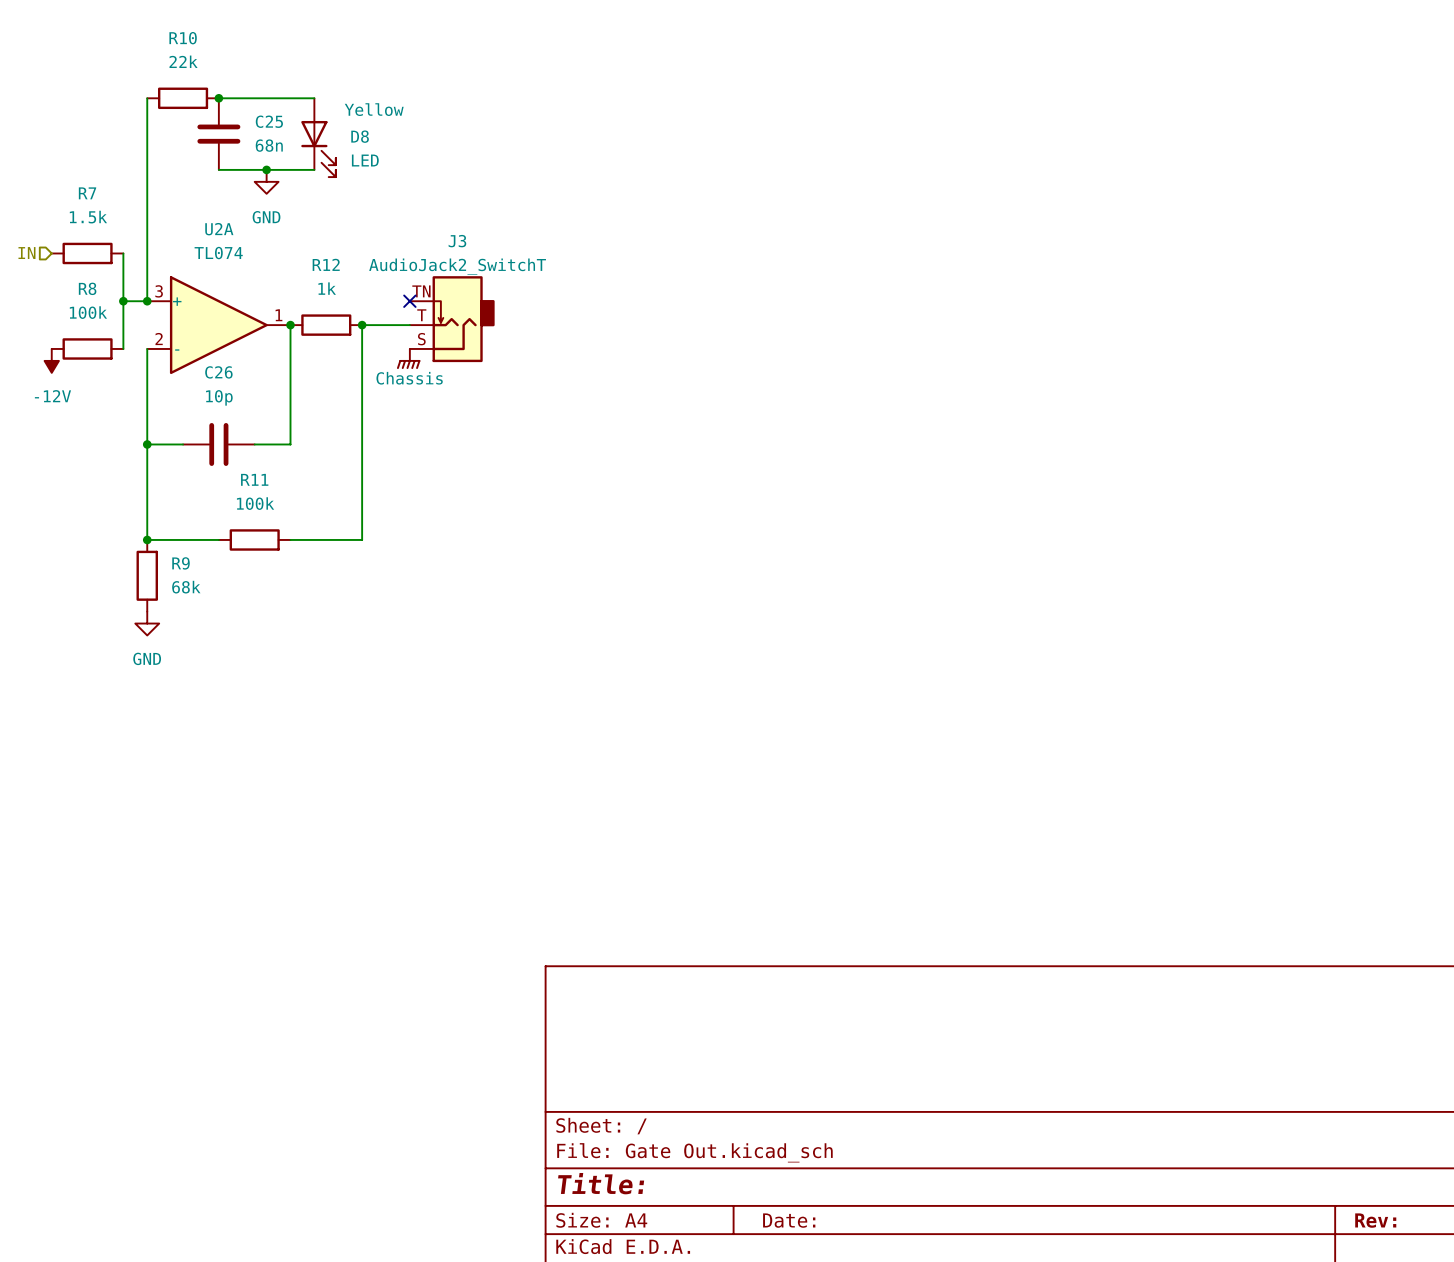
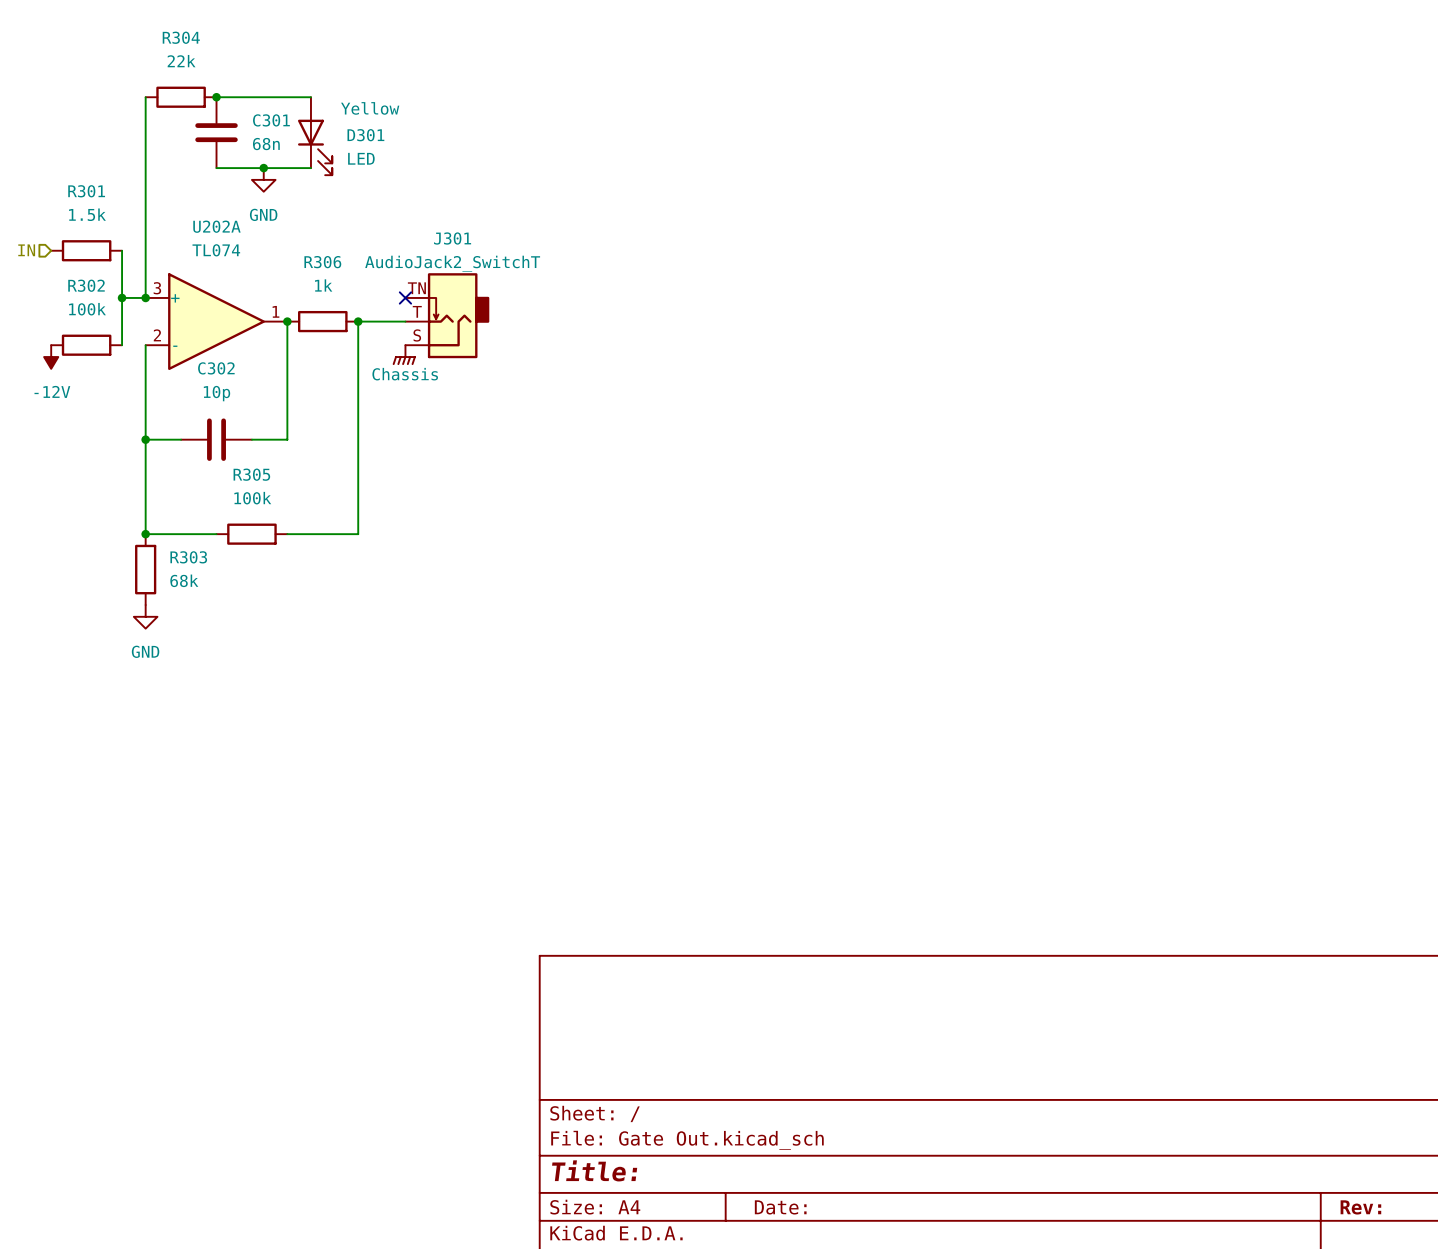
R10 name: R10 (183, 38) -> R304 (181, 37)
C25 name: C25 (269, 121) -> C301 (271, 120)
D8 name: D8 (360, 136) -> D301 (365, 135)
R7 name: R7 (87, 193) -> R301 (86, 191)
U2A name: U2A (219, 229) -> U202A (216, 226)
J3 name: J3 (457, 241) -> J301 (452, 238)
R12 name: R12 (326, 264) -> R306 (322, 262)
R8 name: R8 (87, 288) -> R302 (86, 285)
C26 name: C26 (218, 372) -> C302 (216, 368)
R11 name: R11 (254, 479) -> R305 (251, 474)
R9 name: R9 (181, 563) -> R303 (188, 557)

